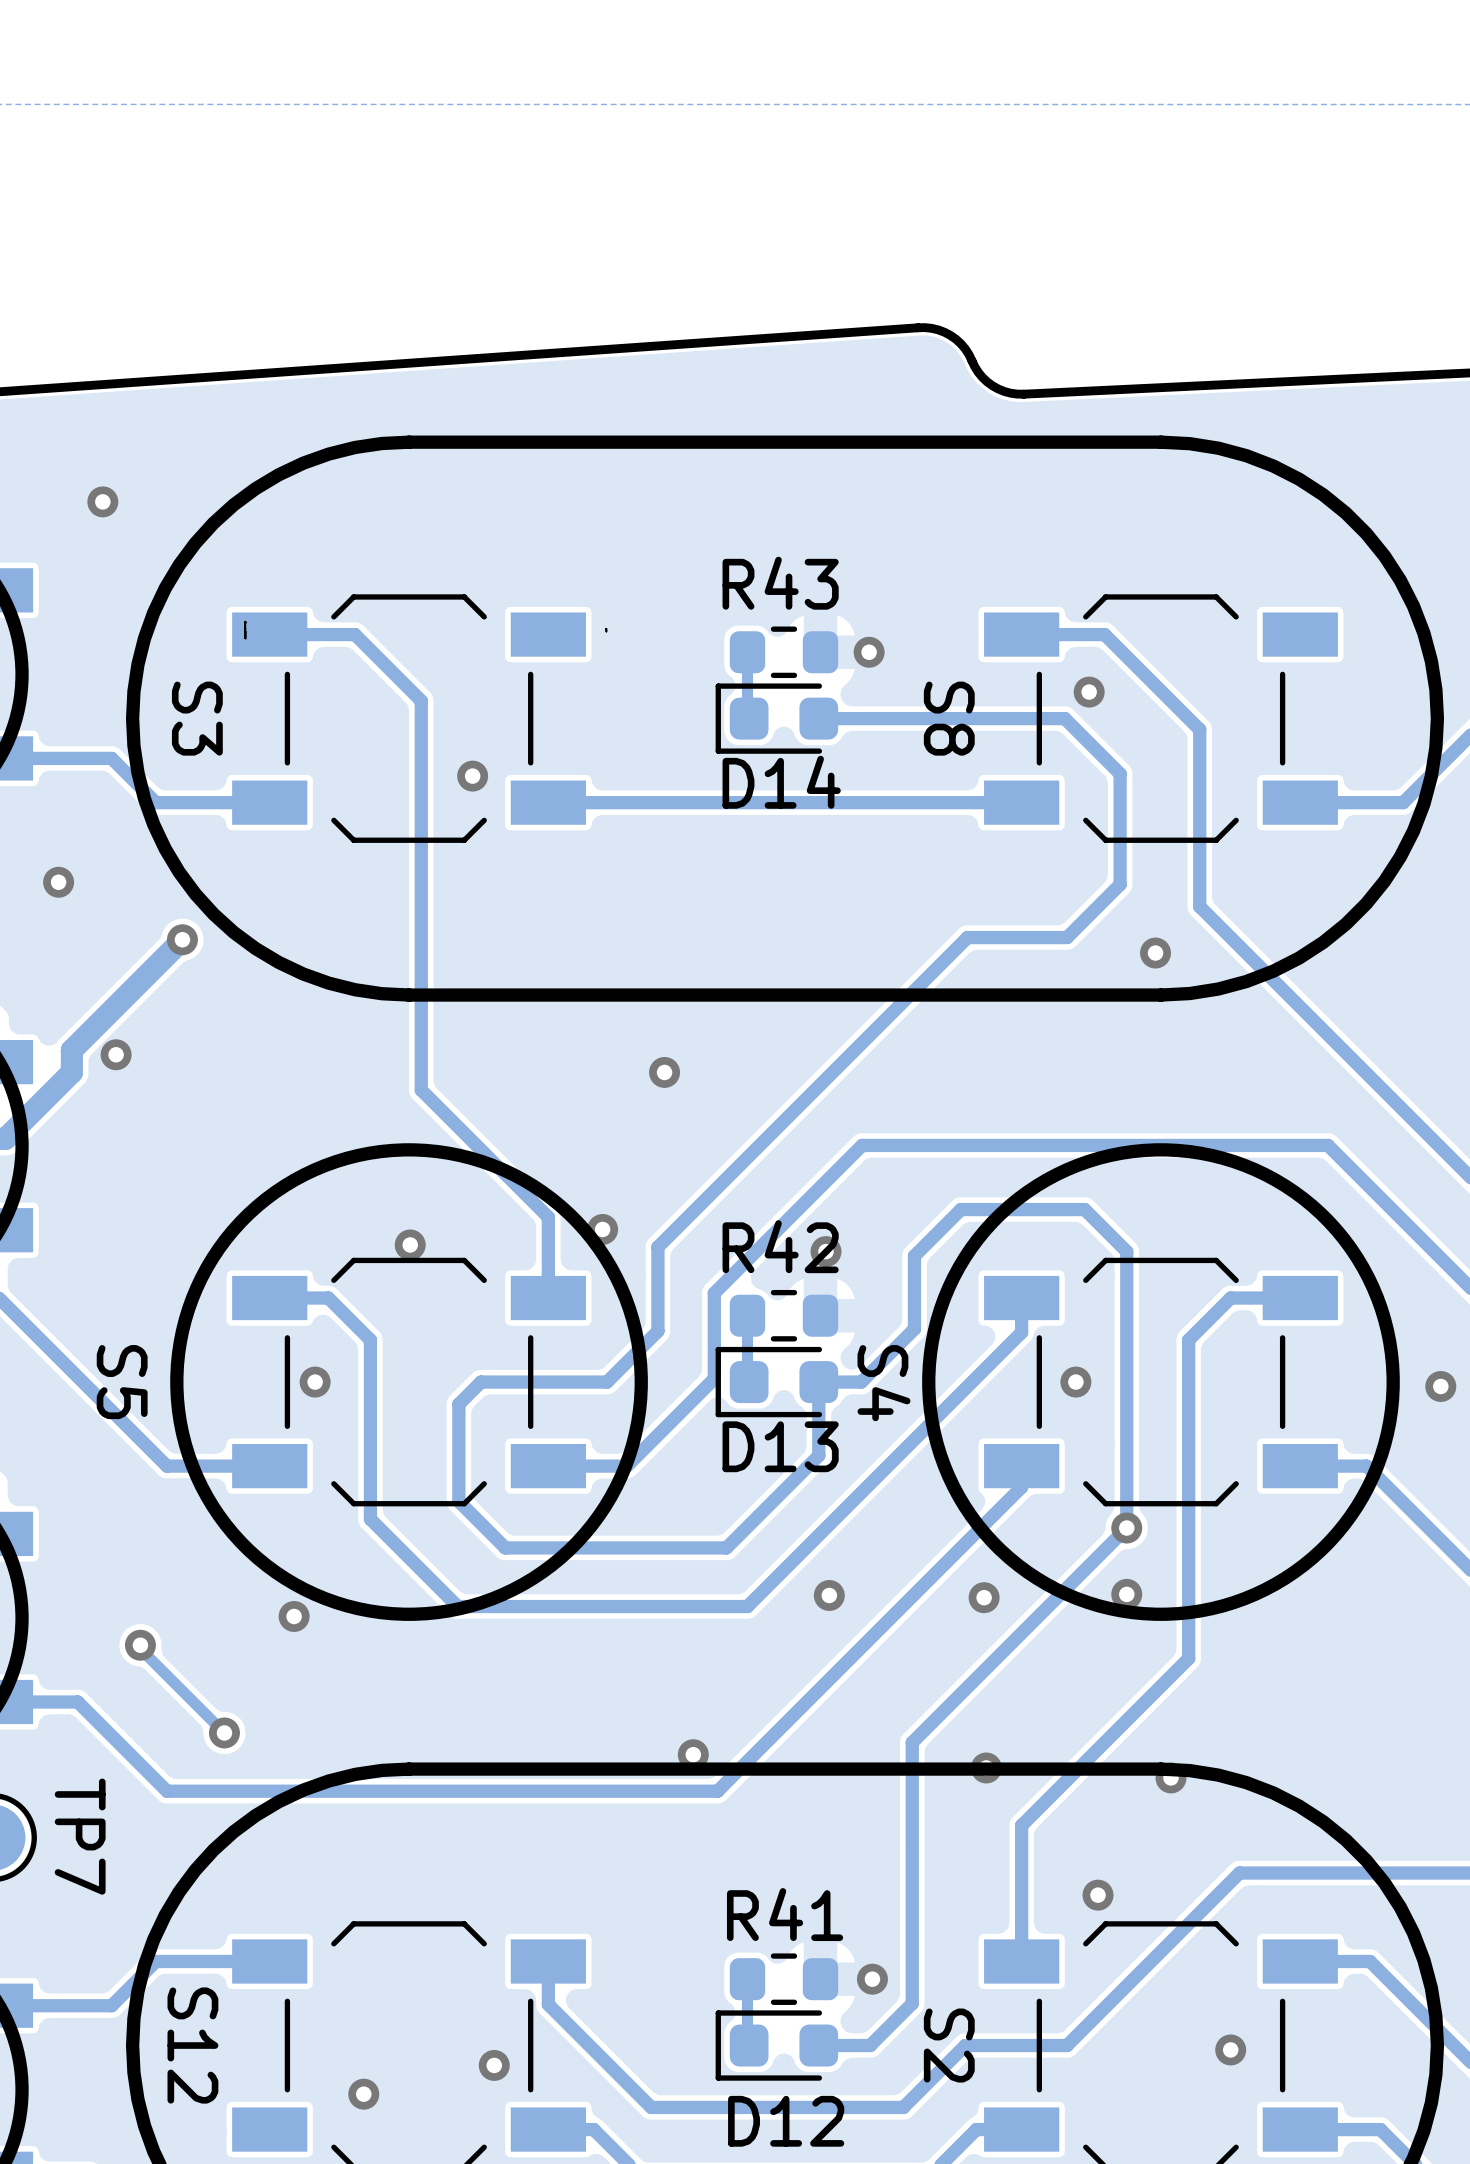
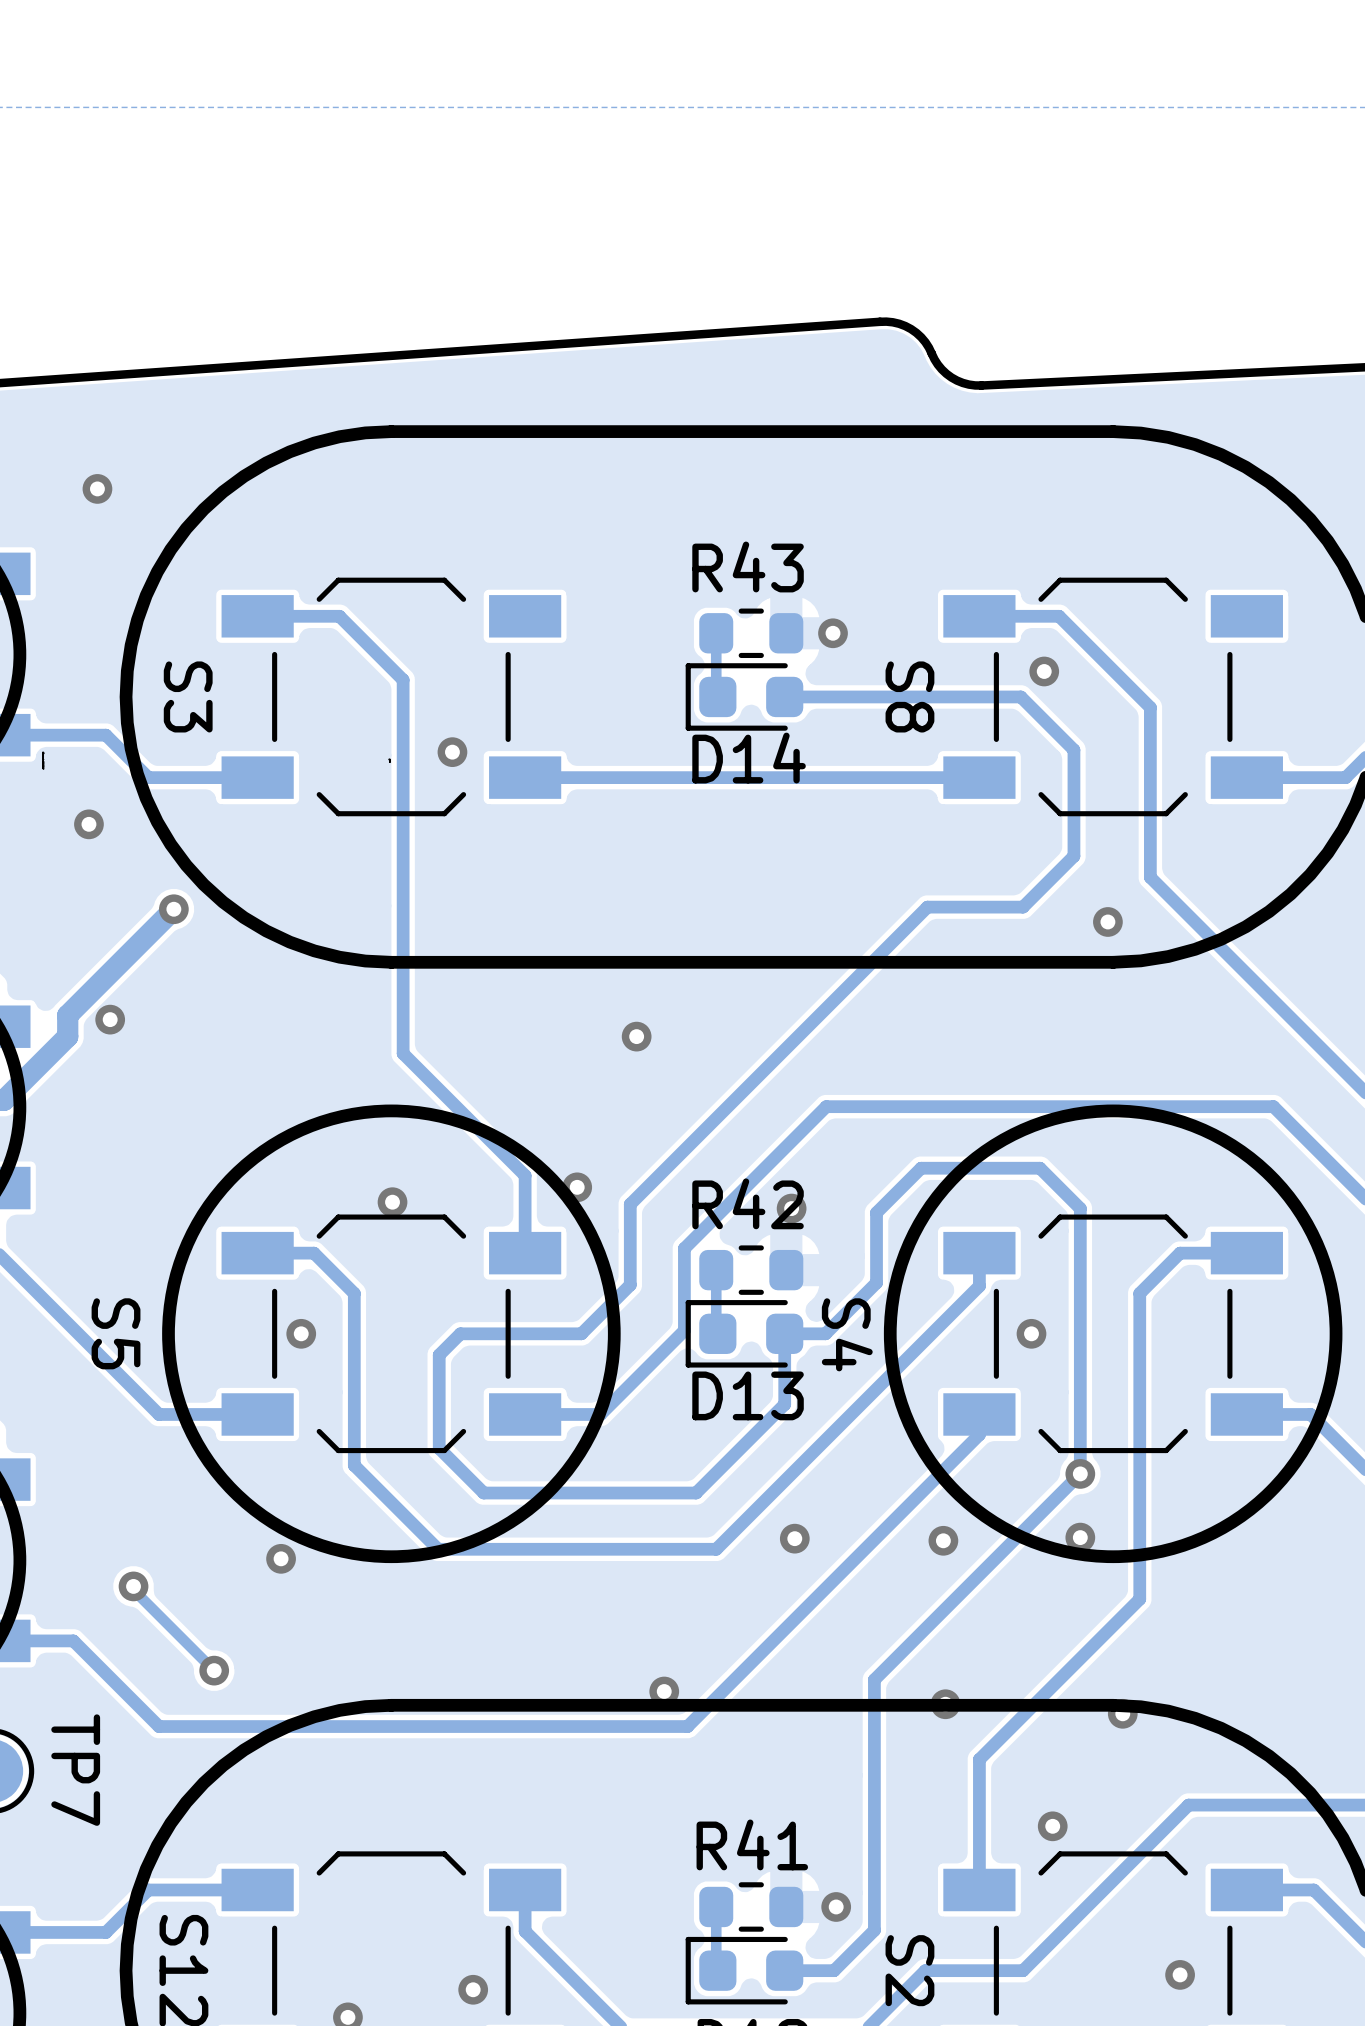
part position: (425, 630) -> (216, 760)
via position: (58, 882) -> (88, 824)

